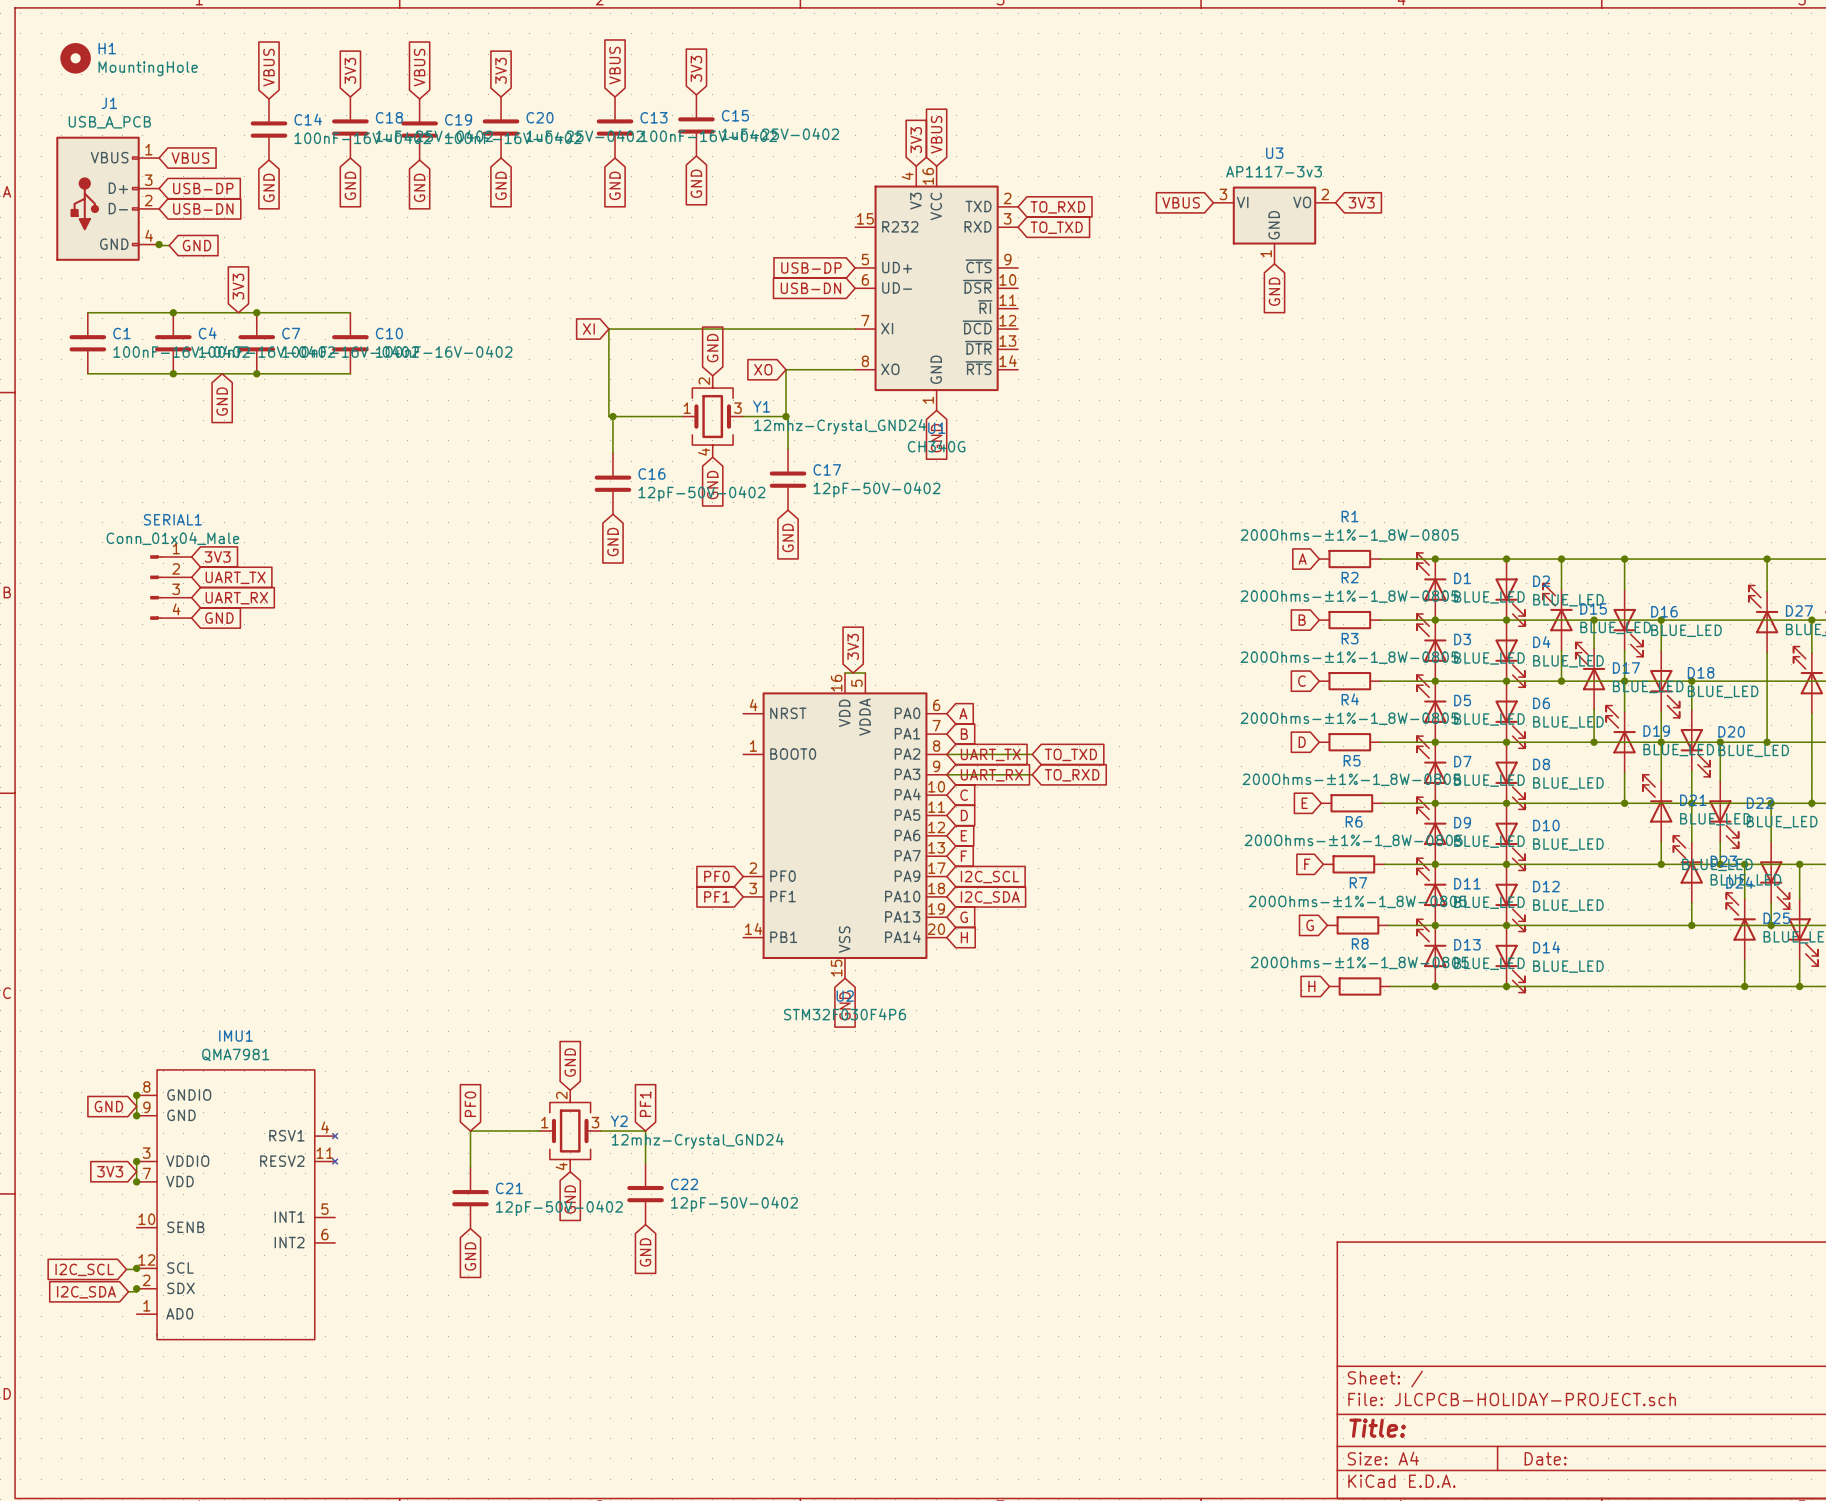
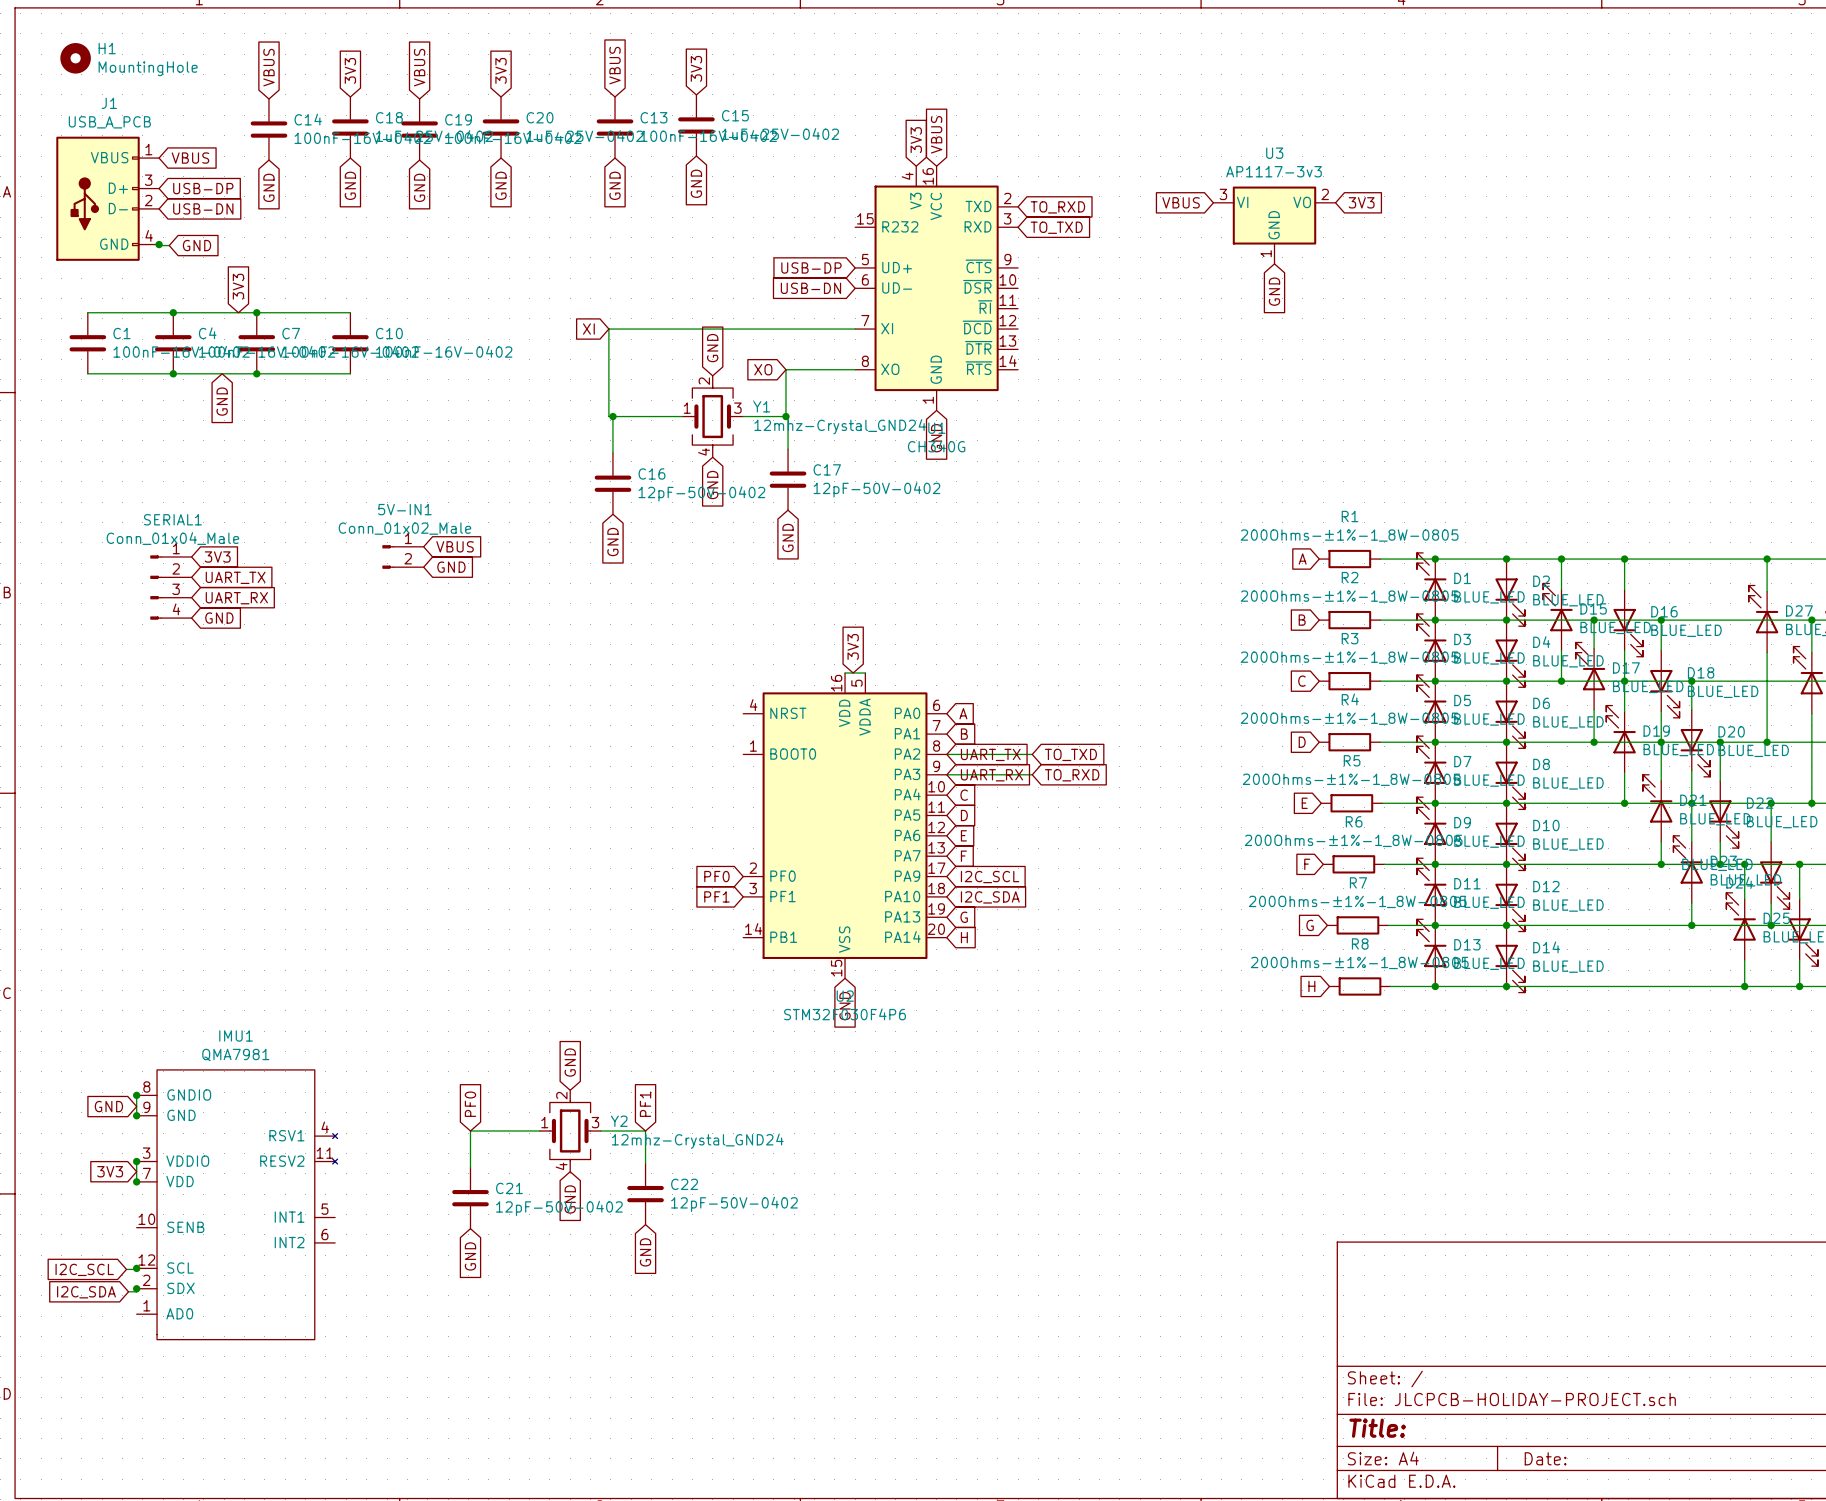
global label: none -> VBUS (455, 546)
5V-IN1: none -> Conn_01x02_Male (403, 556)
global label: none -> GND (451, 567)

